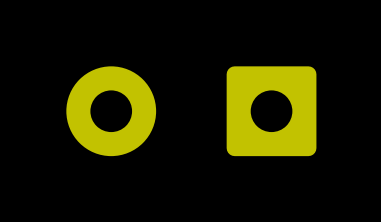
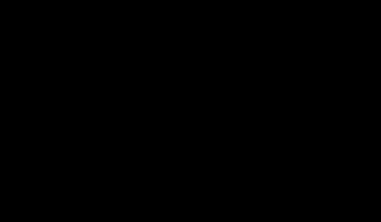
part: (191, 111) -> none

